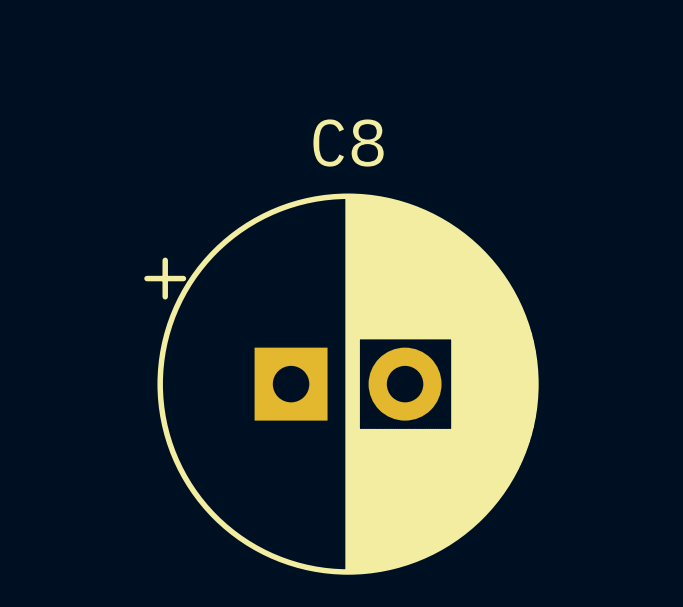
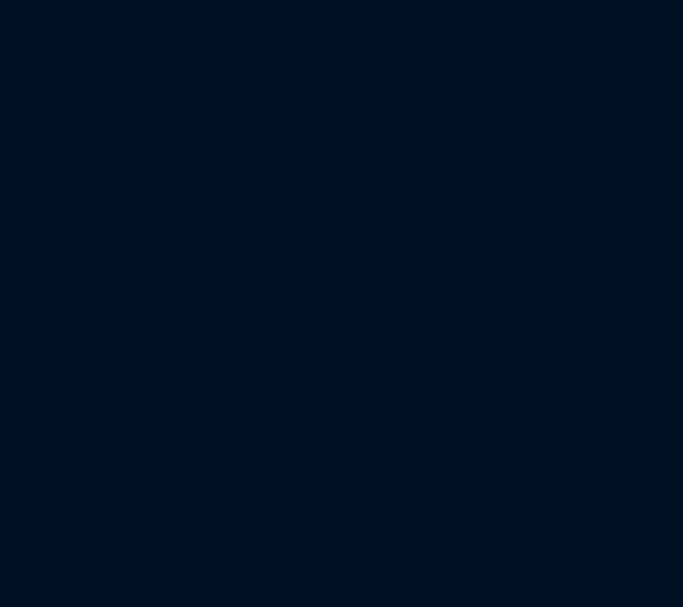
C8: (341, 384) -> none

